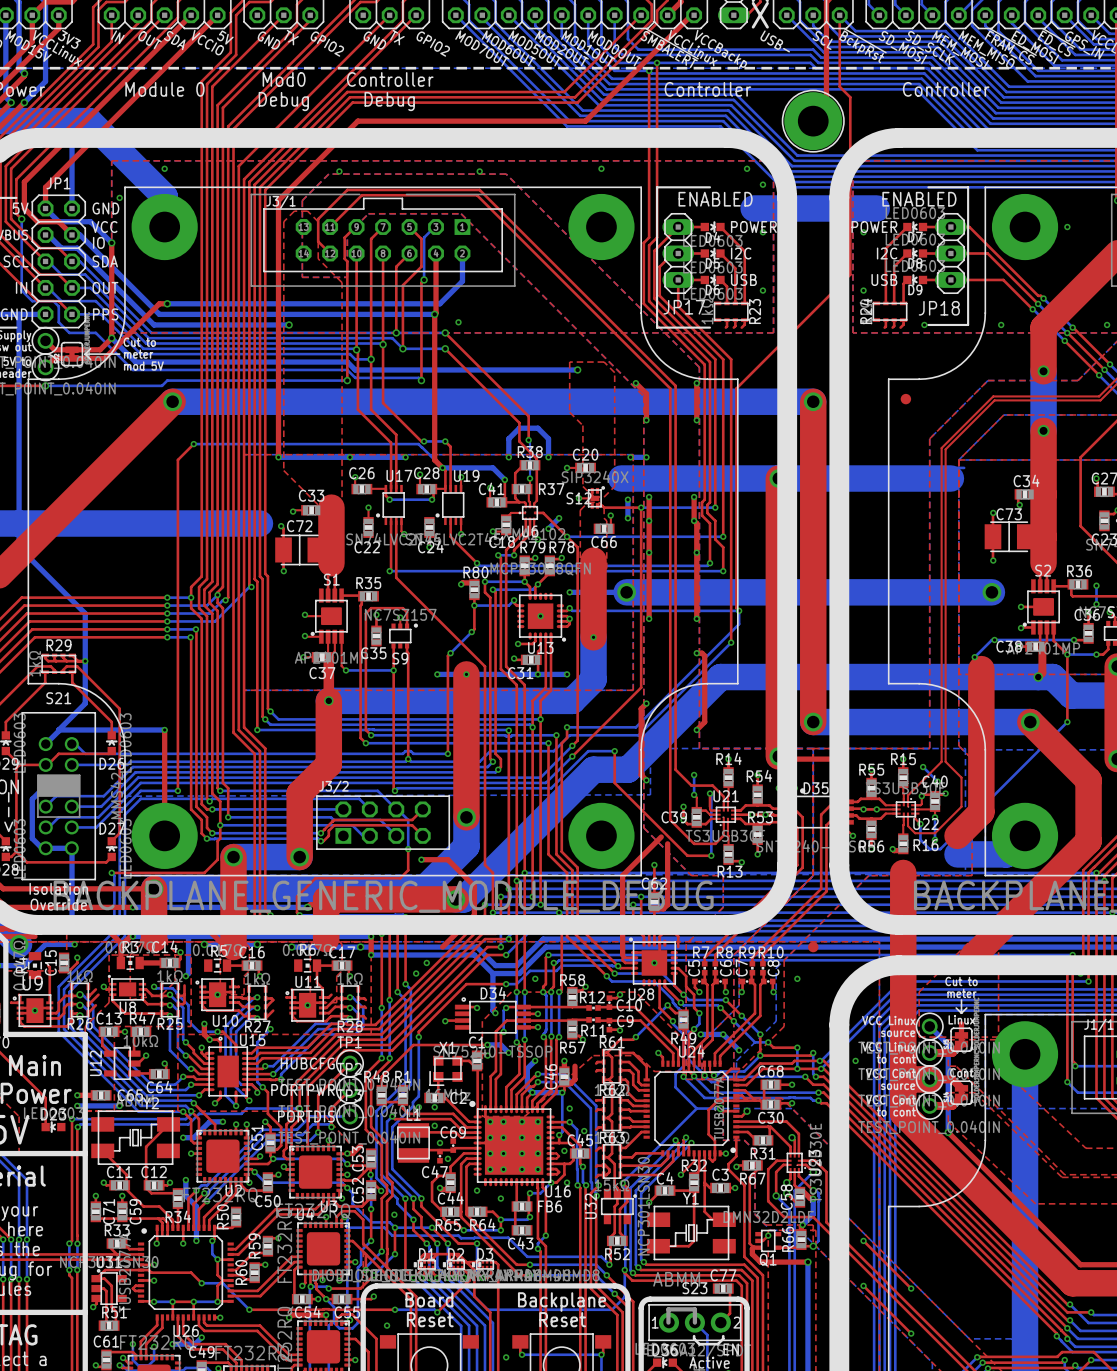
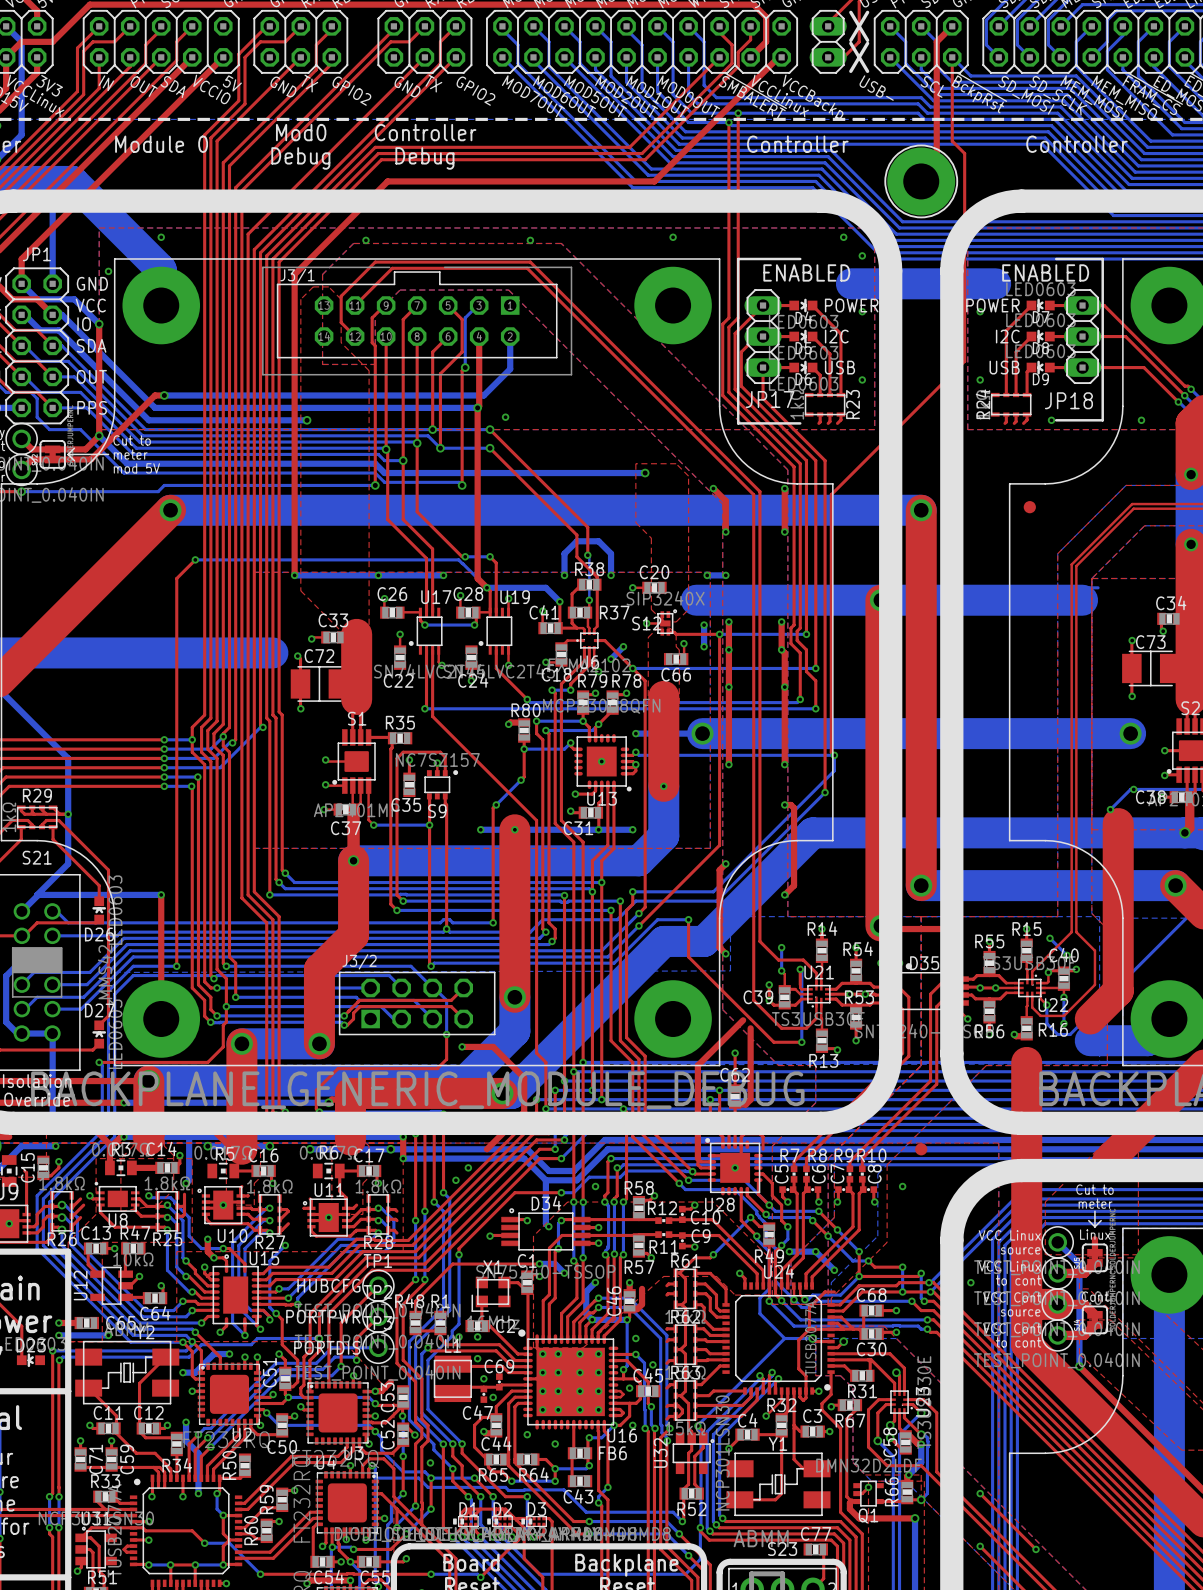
R26 value: 1kΩ (79, 976) -> 1.8kΩ (61, 1183)
R25 value: 1kΩ (169, 976) -> 1.8kΩ (167, 1183)
R27 value: 1kΩ (257, 978) -> 1.8kΩ (269, 1186)
R28 value: 1kΩ (349, 978) -> 1.8kΩ (378, 1186)

